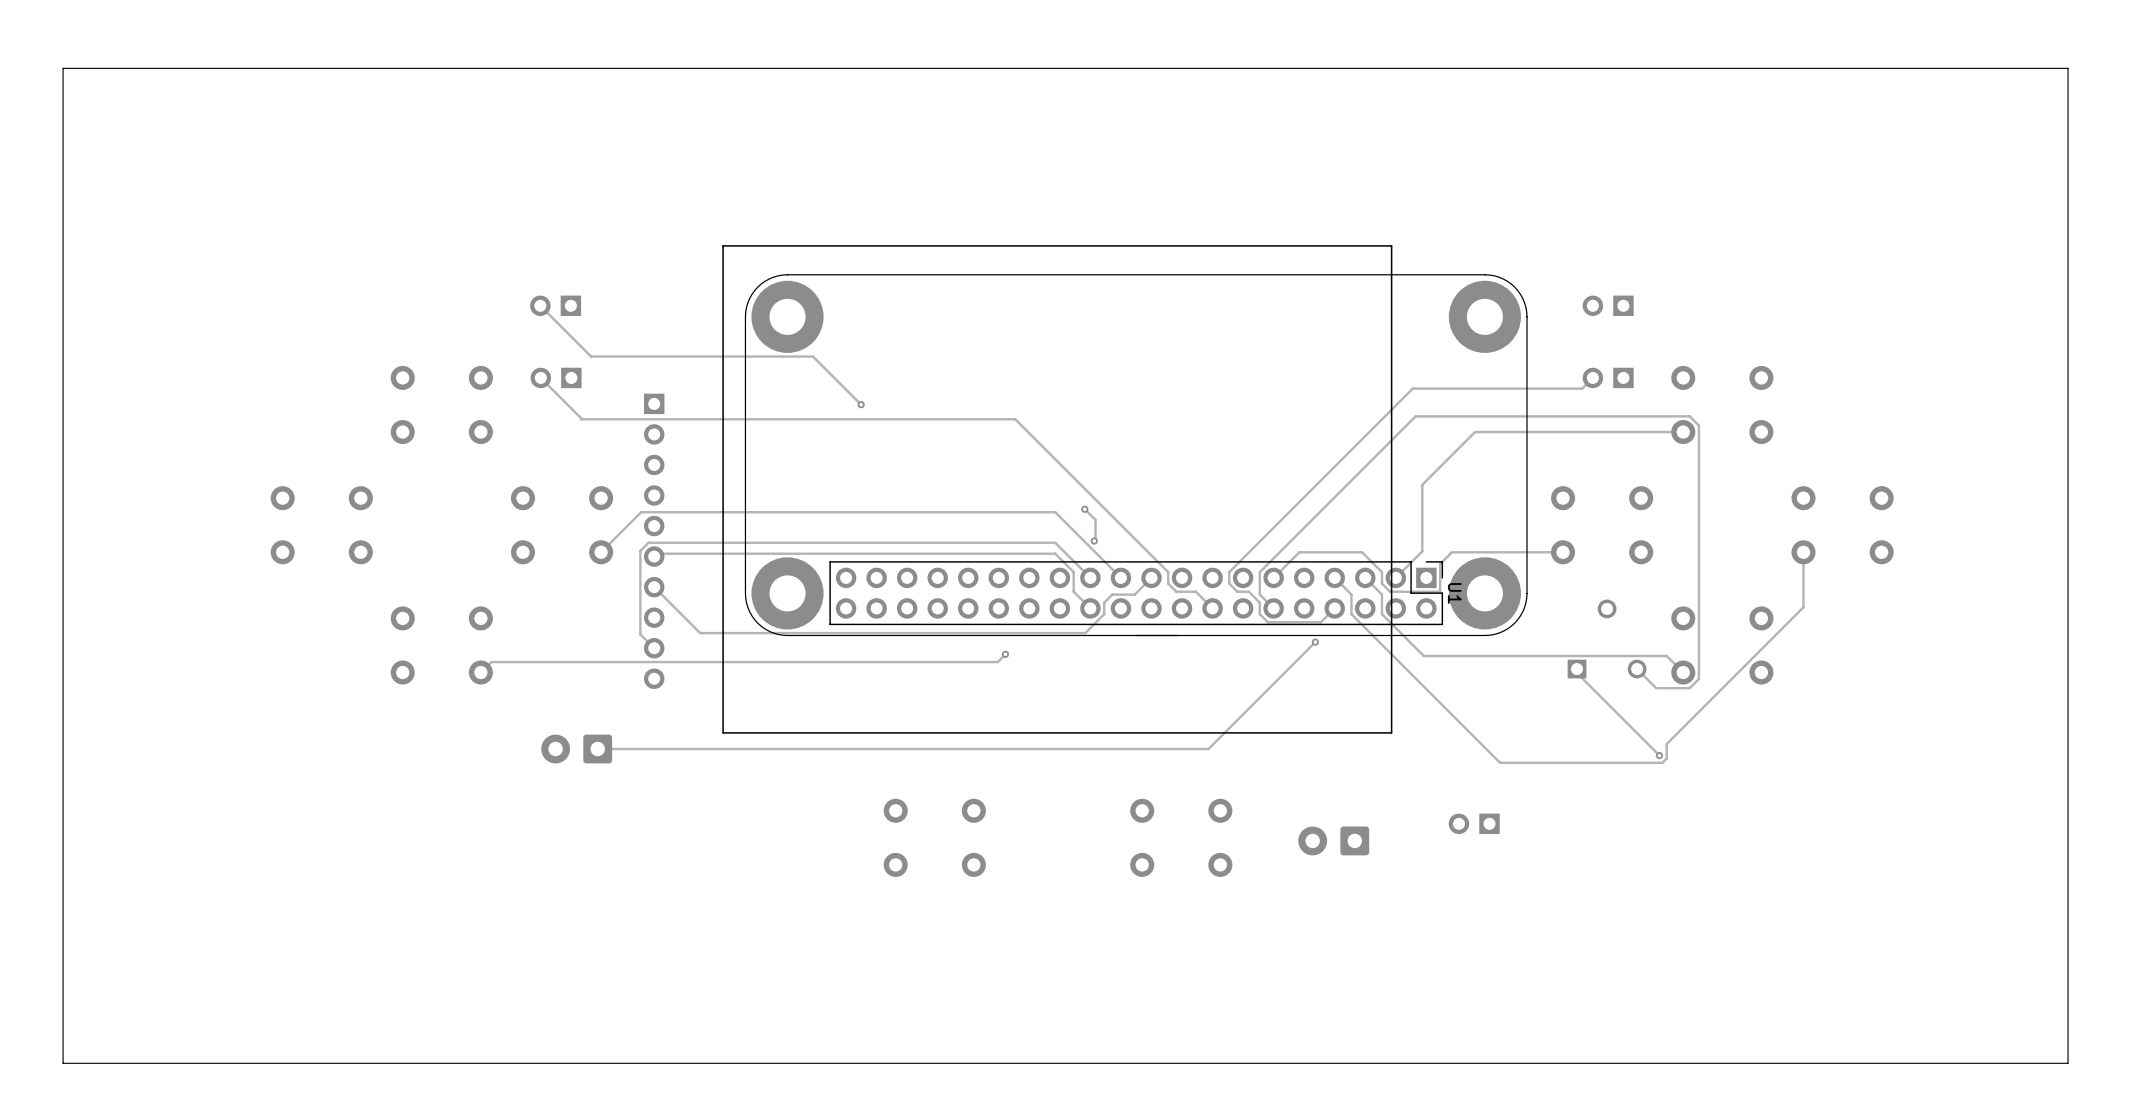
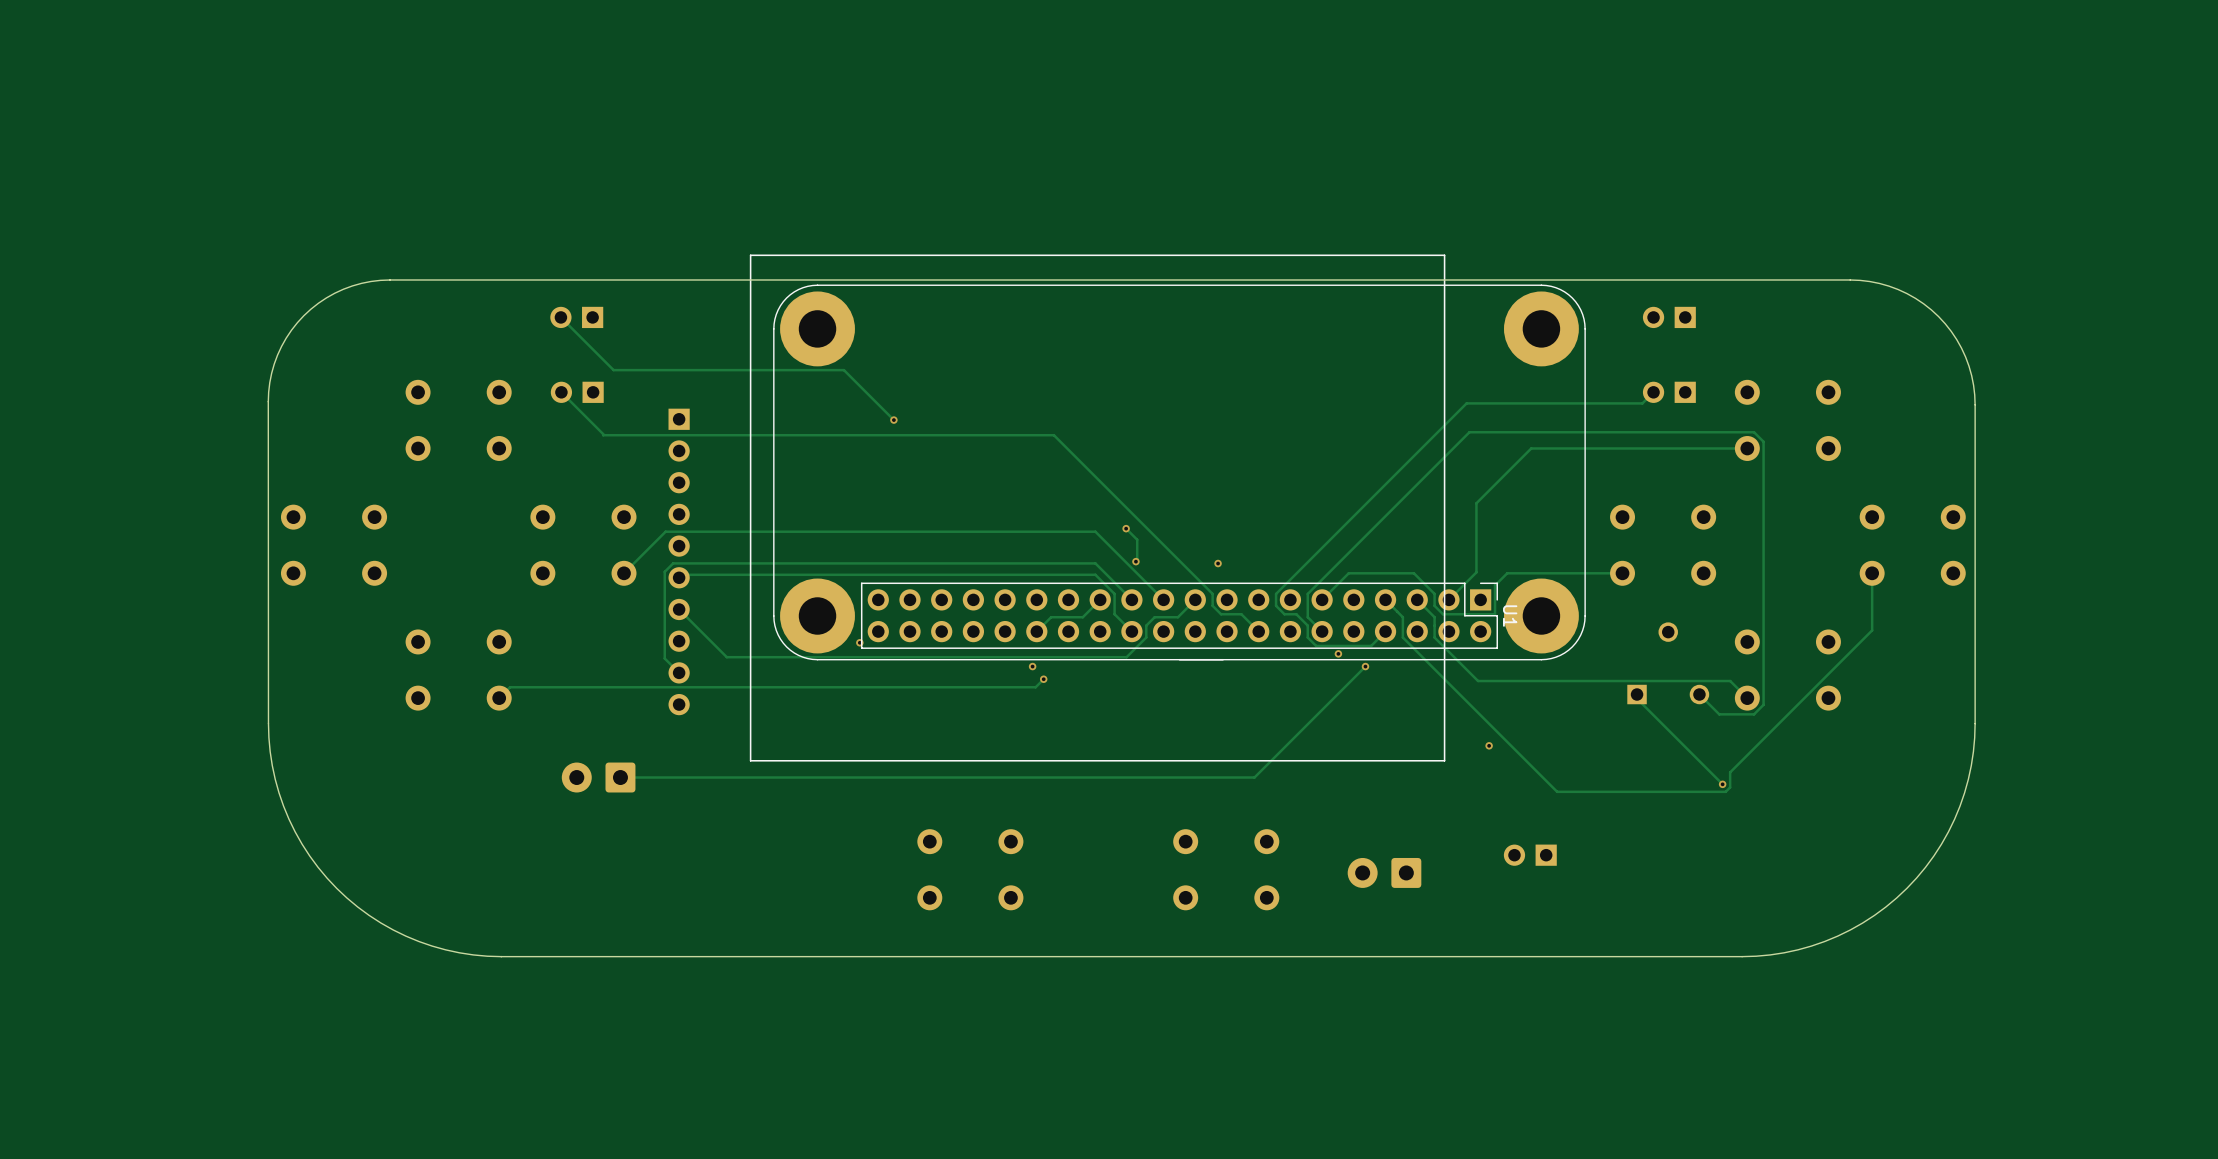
board edge: (2068, 68) (63, 68) (63, 1063) (2068, 1063) (2068, 68) -> none
via: none -> (1218, 563)
track: none -> (1100, 599) (1082, 617) (1051, 617) (1036, 631)
via: none -> (859, 642)
via: none -> (1338, 653)
via: none -> (1032, 666)
via: none -> (1489, 745)
board edge: none -> (501, 956) (487, 956) (473, 954) (459, 952) (418, 941) (393, 929) (357, 907) (327, 878) (302, 844) (283, 806) (275, 779) (270, 751) (268, 723) (269, 382) (277, 355) (297, 322) (318, 303) (343, 289) (370, 281) (389, 279) (1860, 280) (1879, 283) (1898, 289) (1923, 303) (1938, 316) (1951, 331) (1965, 357) (1973, 385) (1975, 404) (1975, 723) (1973, 751) (1968, 779) (1959, 806) (1948, 831) (1933, 855) (1916, 878) (1896, 898) (1874, 915) (1850, 929) (1824, 941) (1784, 952) (1742, 956) (501, 956)

